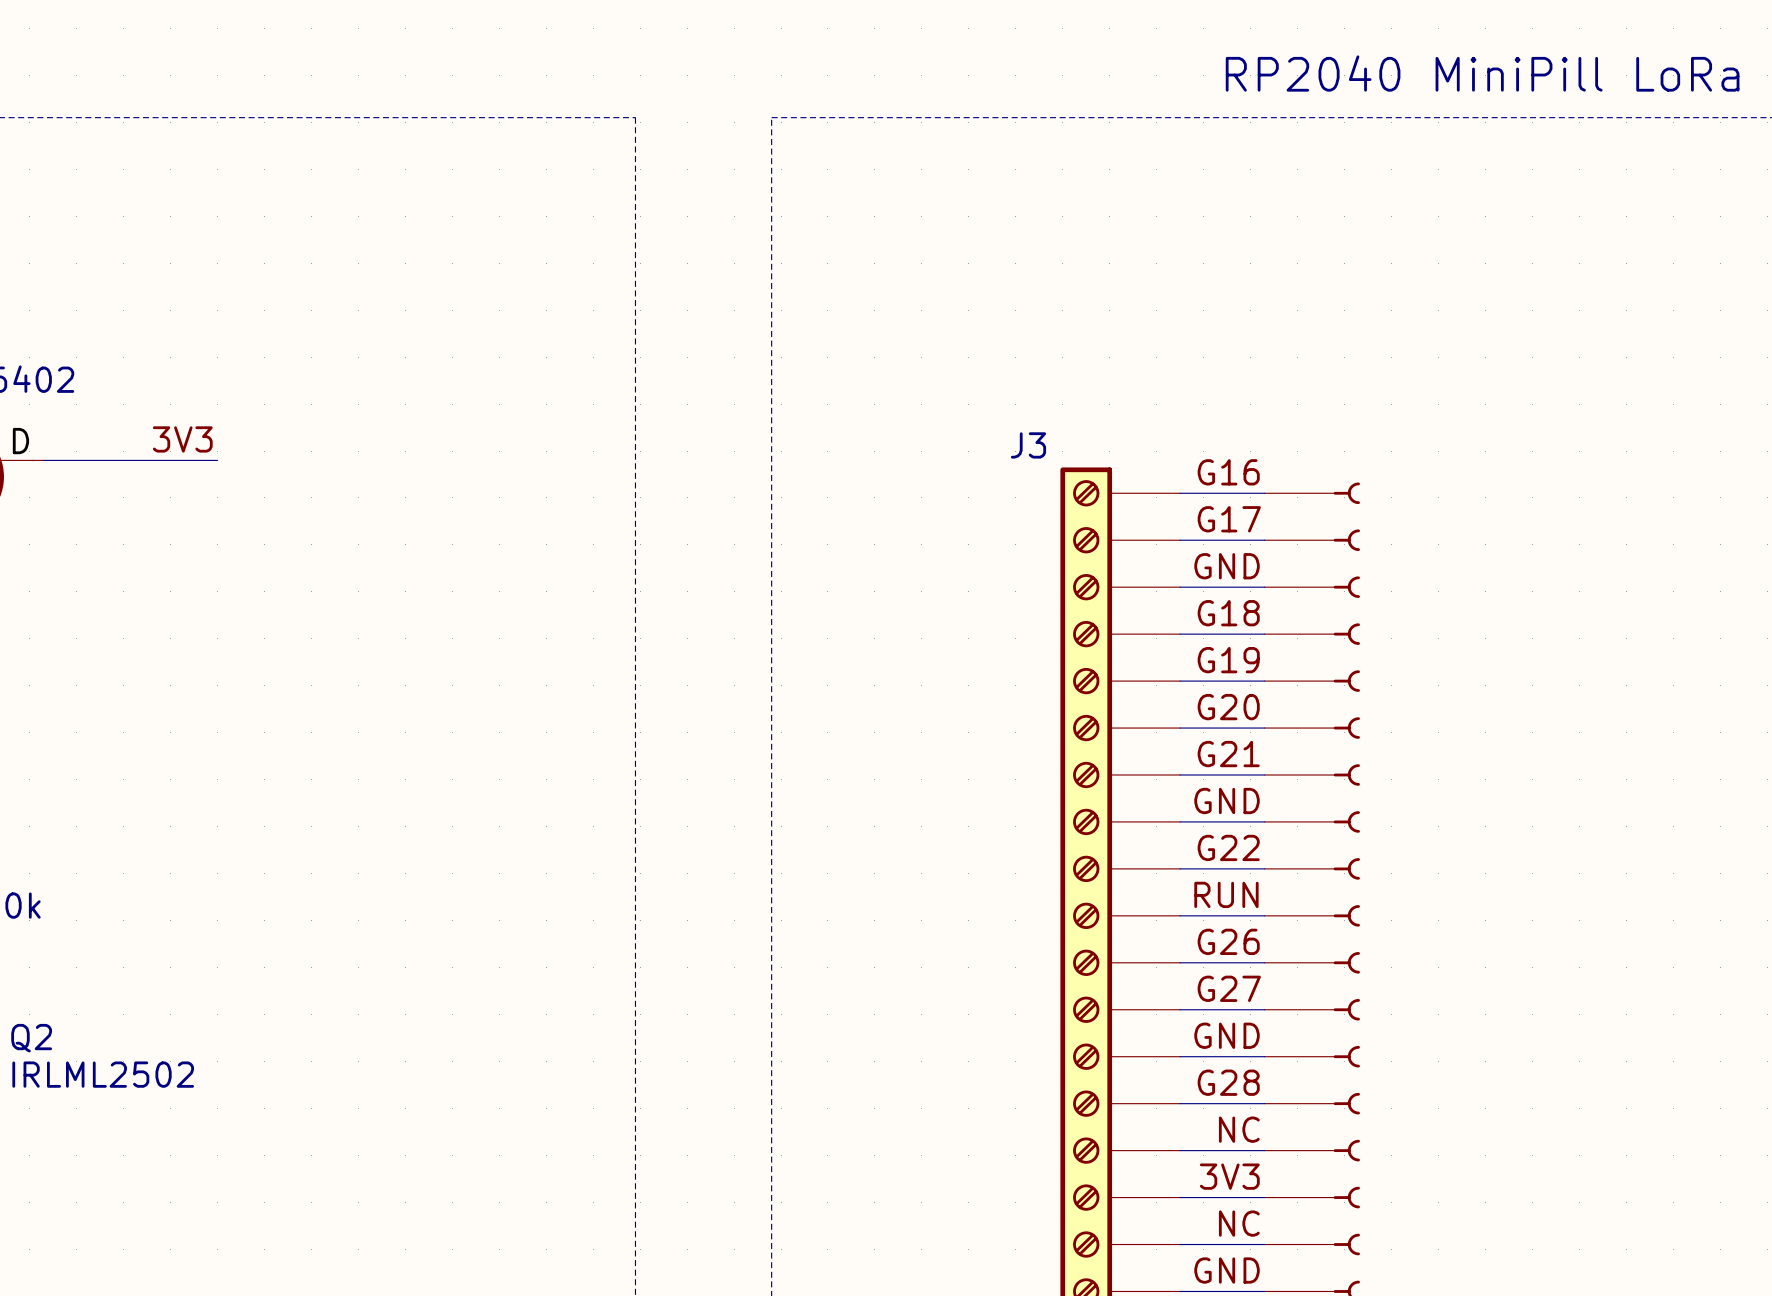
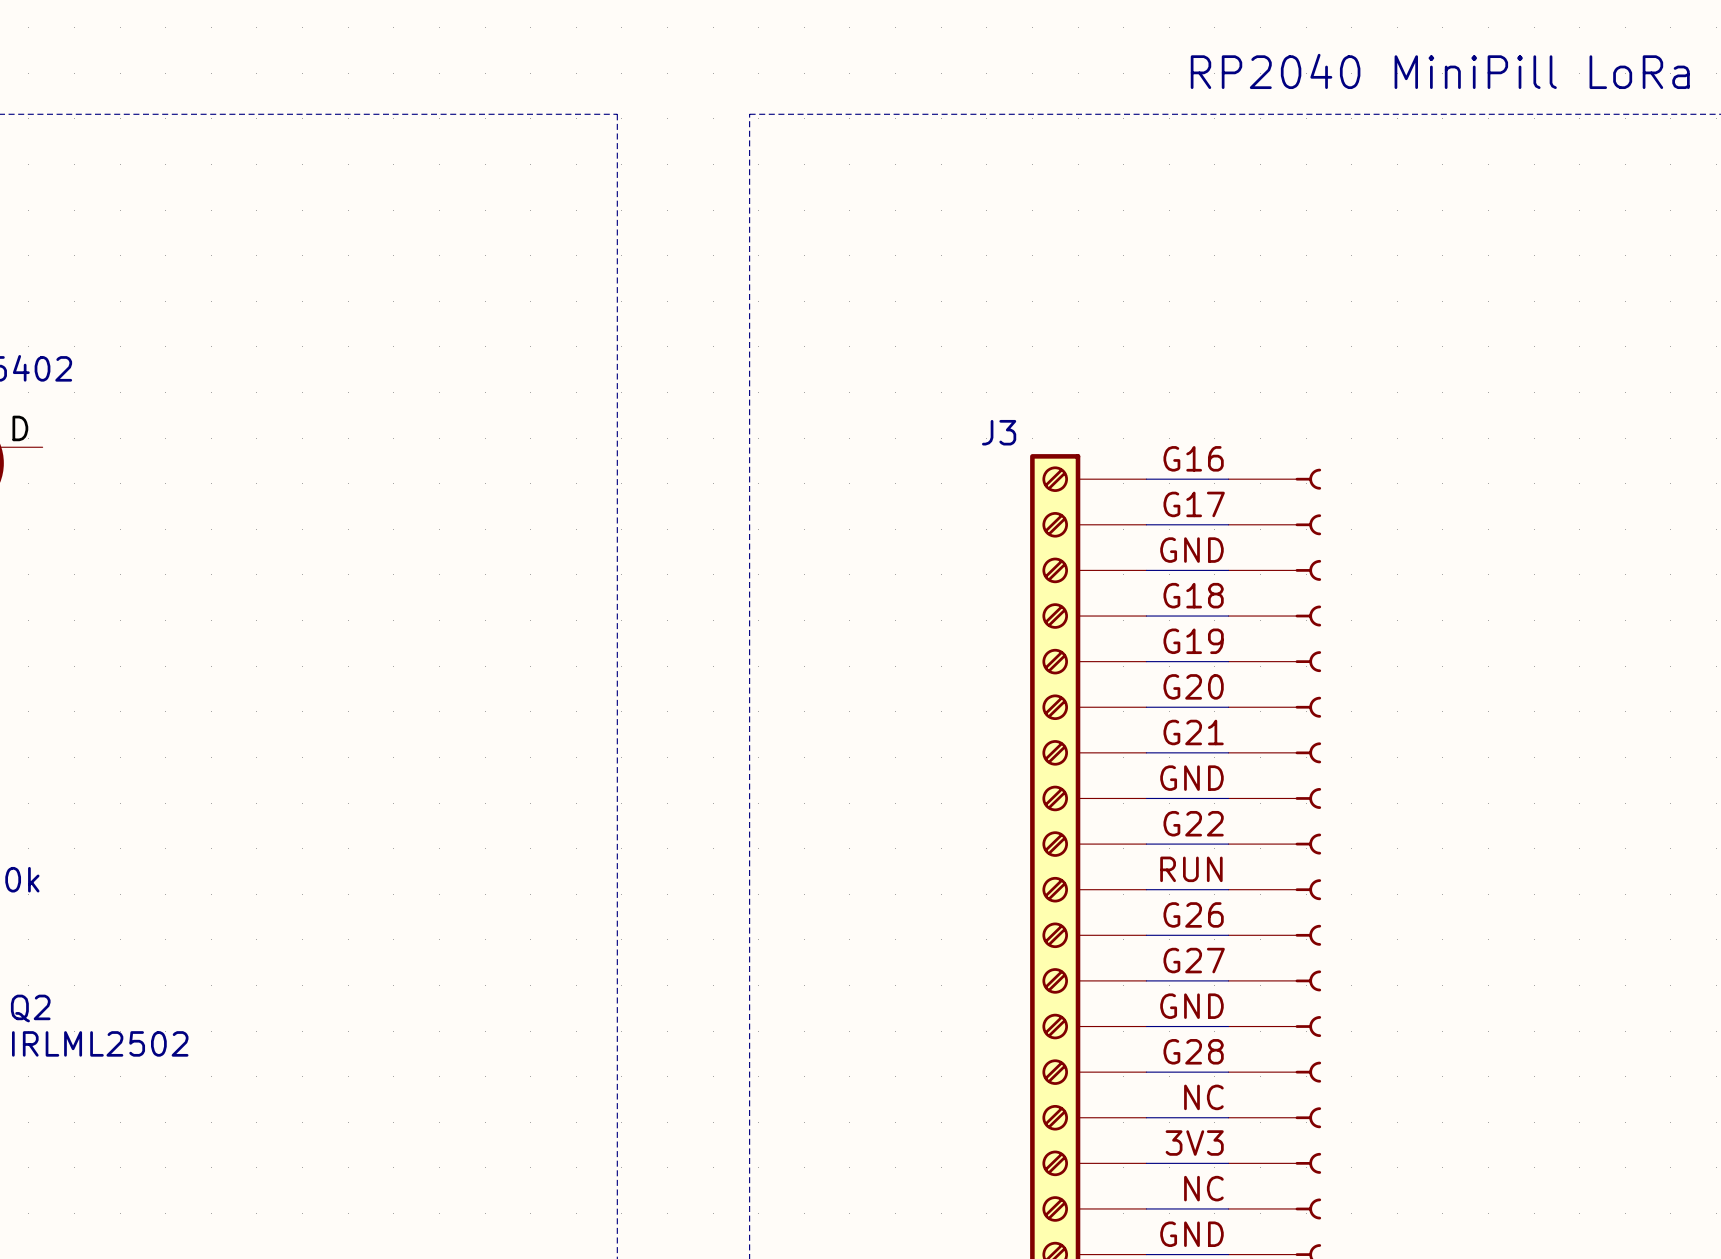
label: 3V3 (182, 439) -> none
wire: (43, 460) (217, 460) -> none

